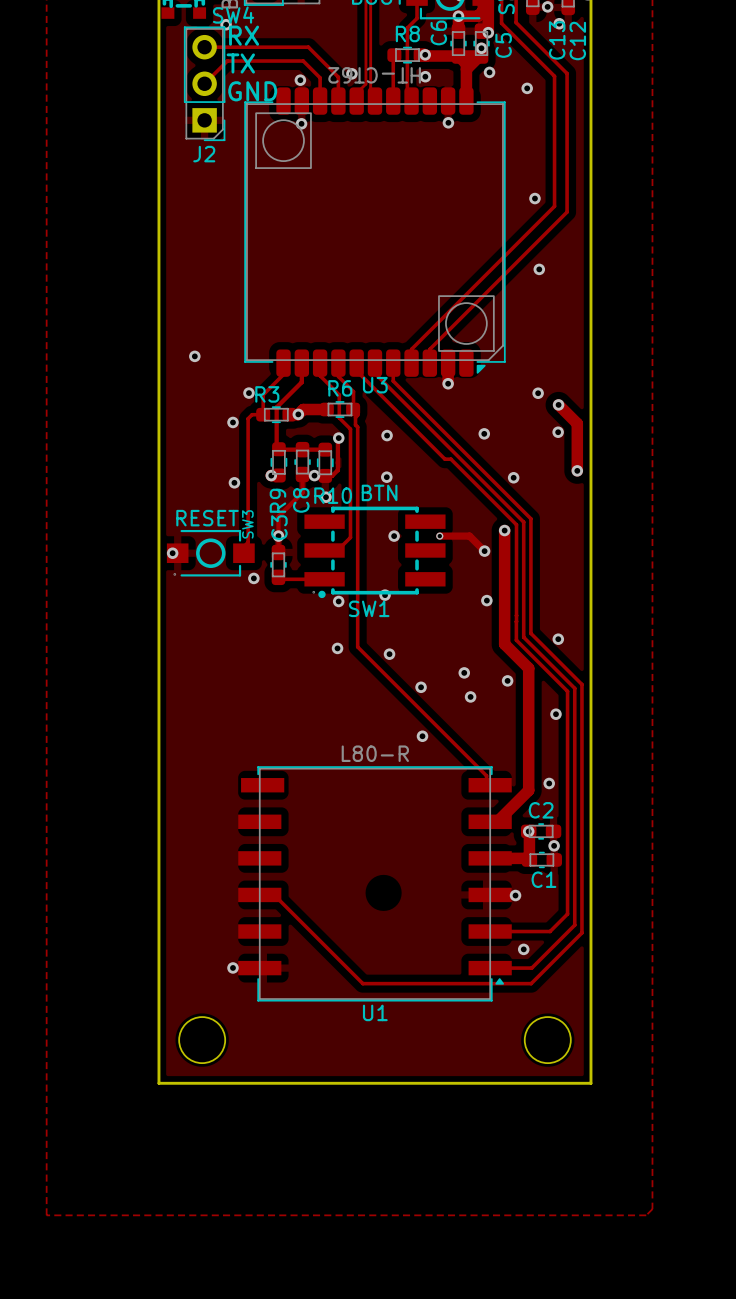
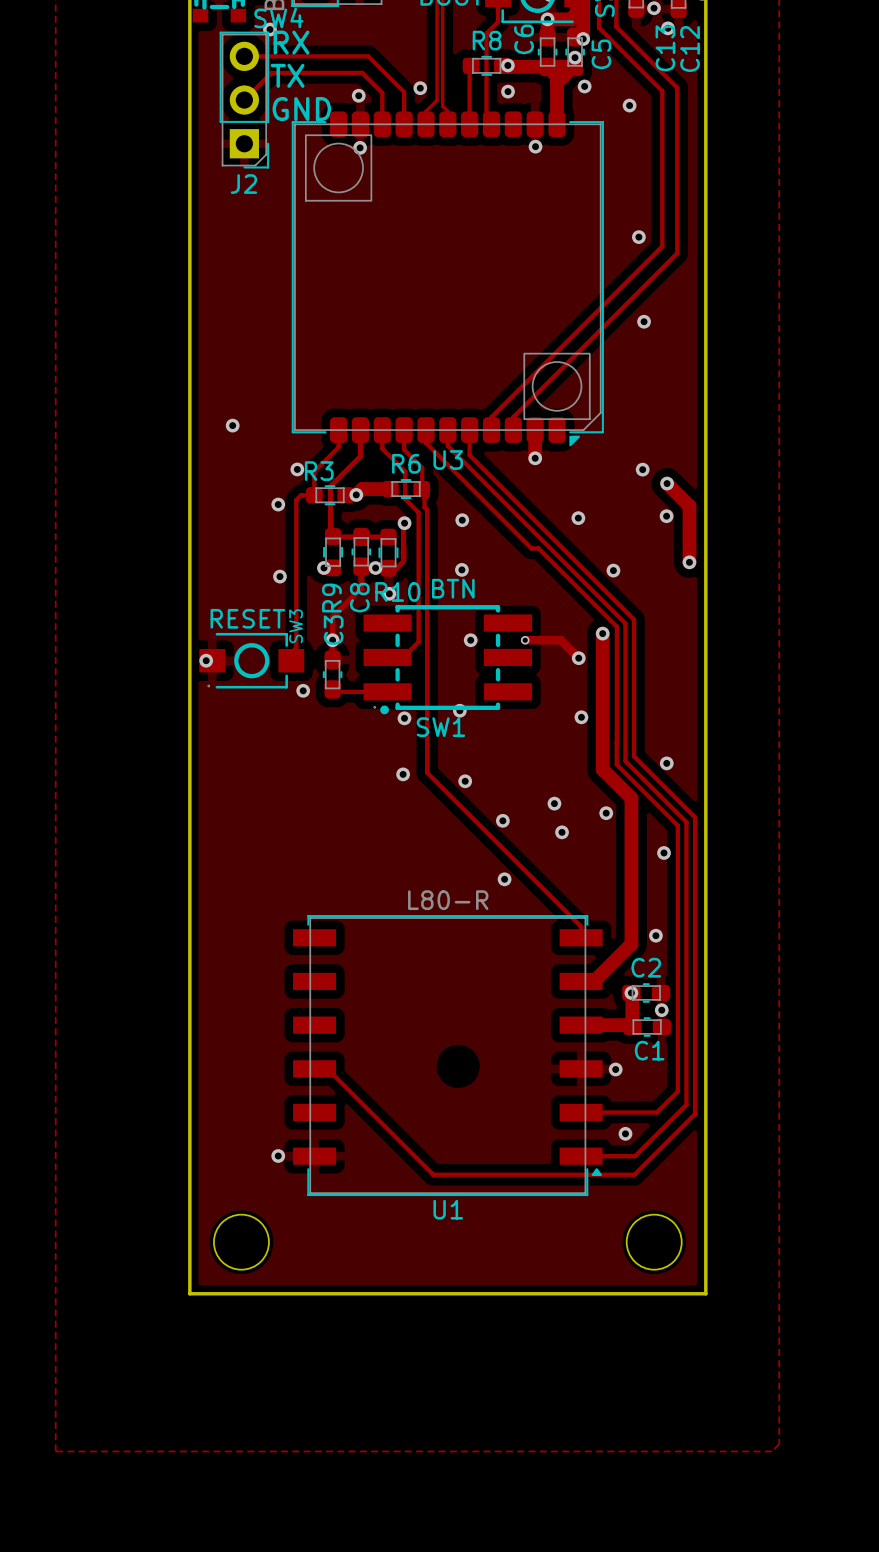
U3 value: HT-CT62 (374, 75) -> none
U3 footprint: [244, 87, 506, 377] -> [291, 111, 604, 447]
U1 footprint: [238, 766, 512, 1002] -> [293, 915, 603, 1197]

